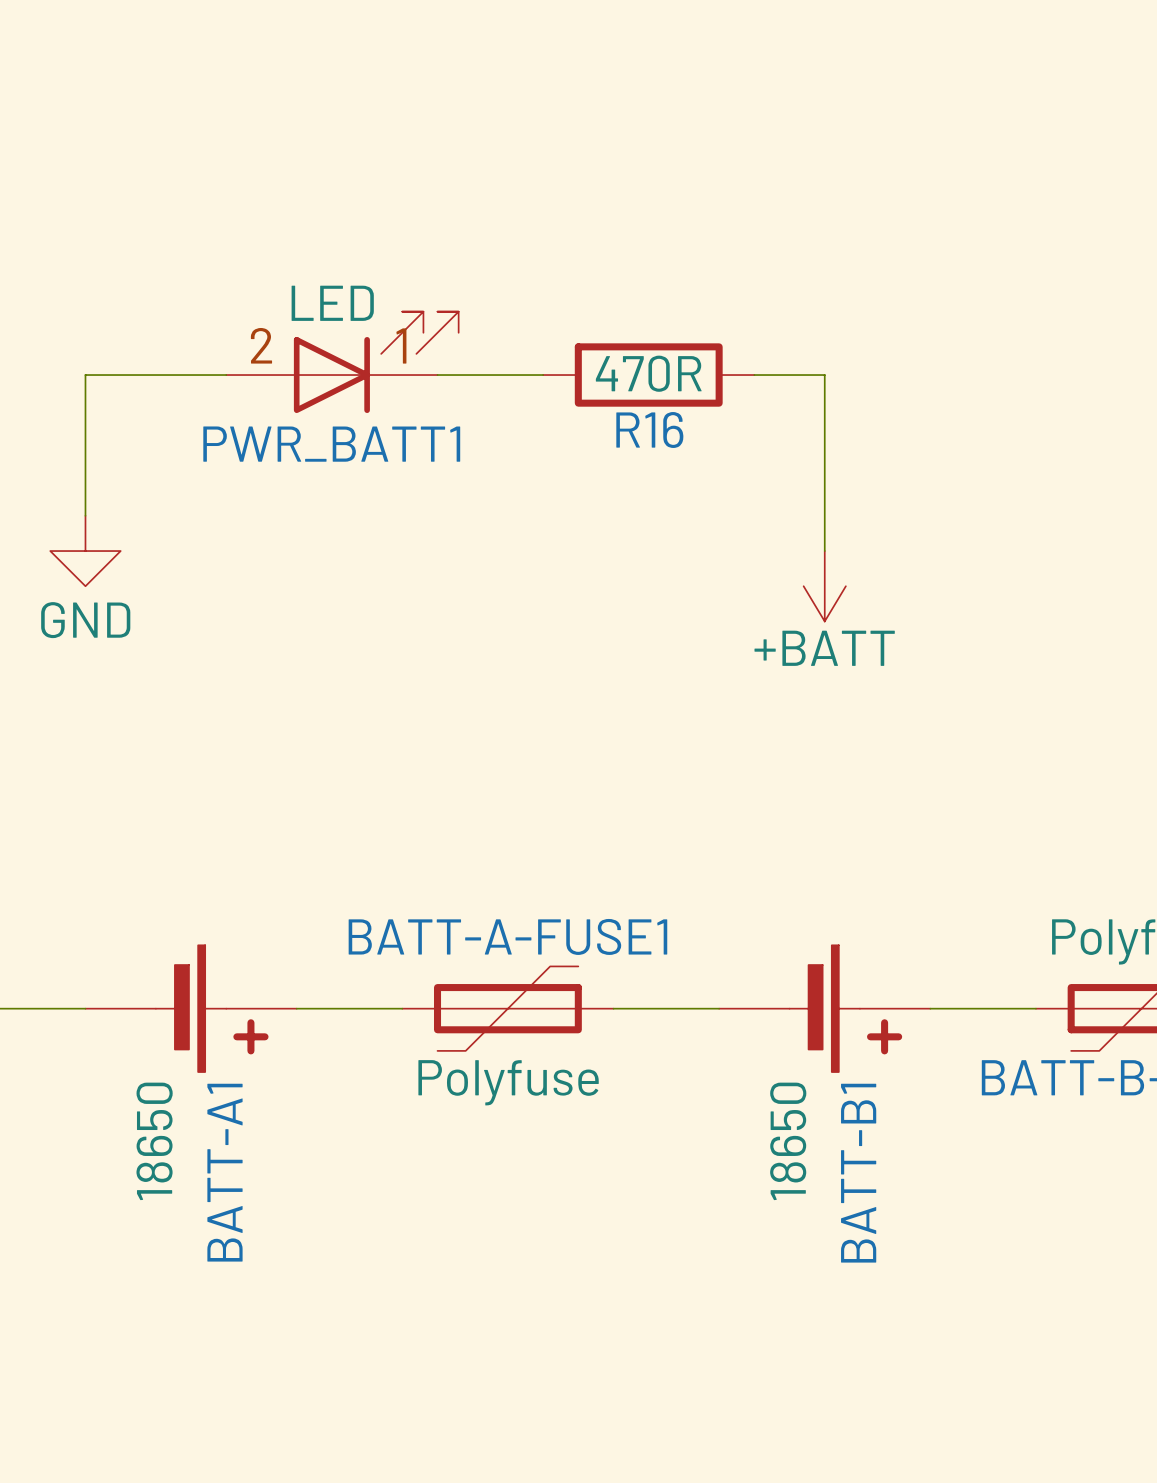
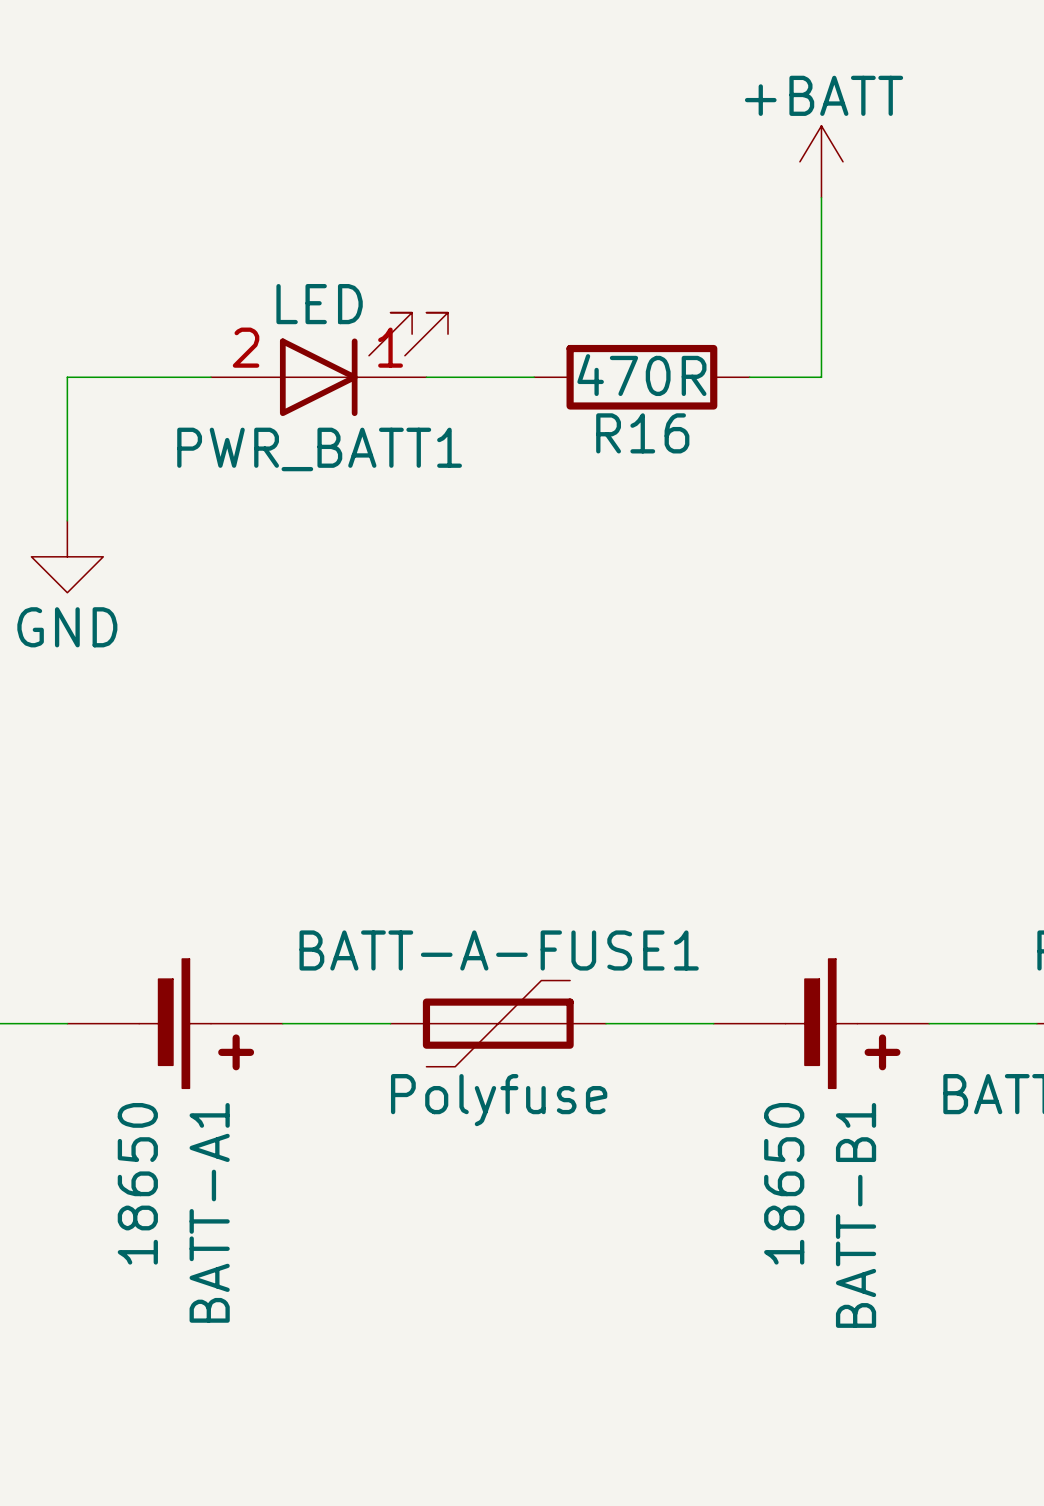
wire: (824, 375) (824, 551) -> (821, 377) (821, 197)
power symbol rotation: 0° (824, 586) -> 180° (821, 161)
power symbol position: +BATT (824, 586) -> +BATT (821, 161)

